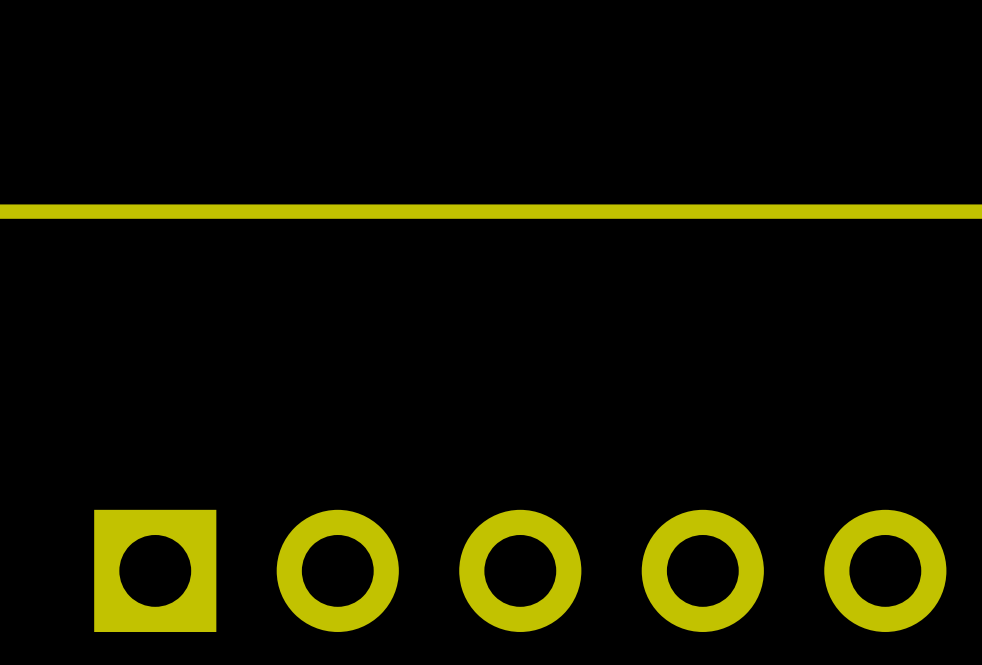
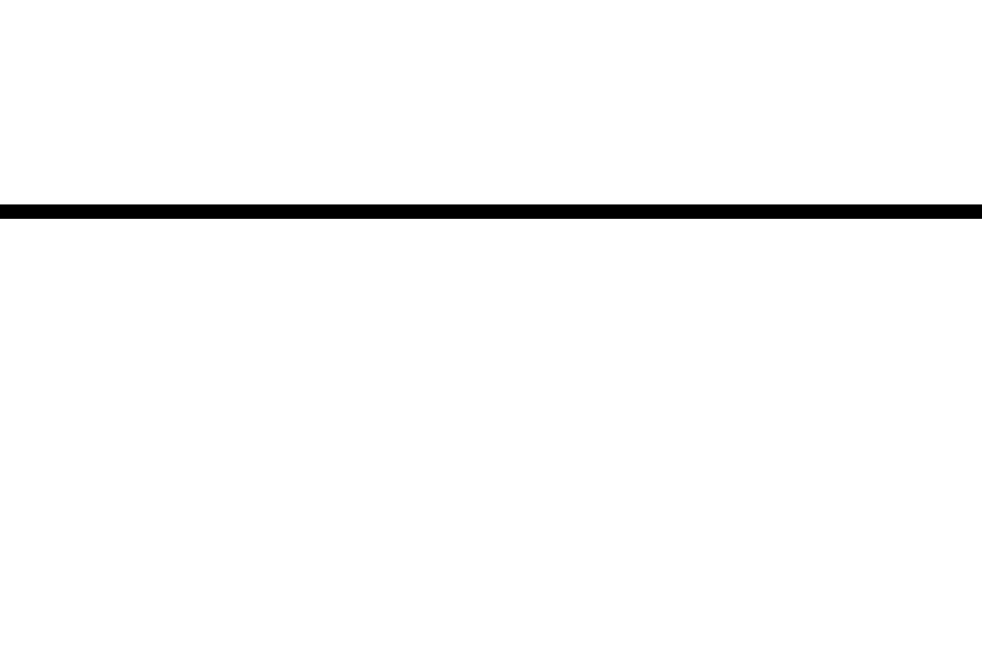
part: (520, 570) -> none

